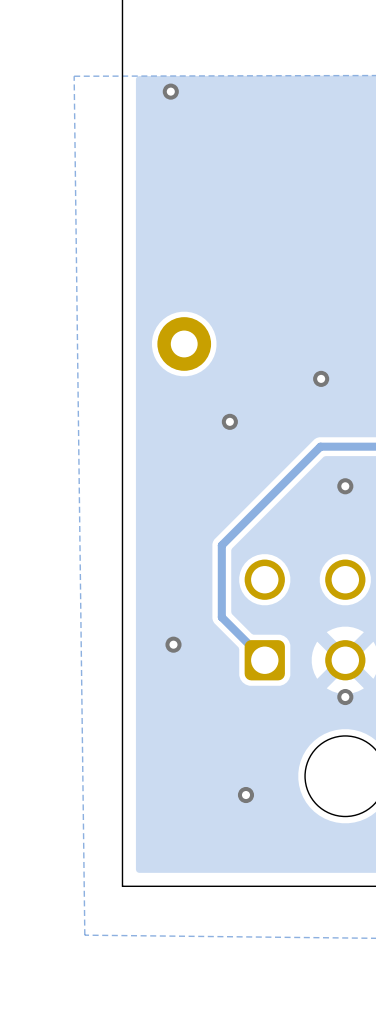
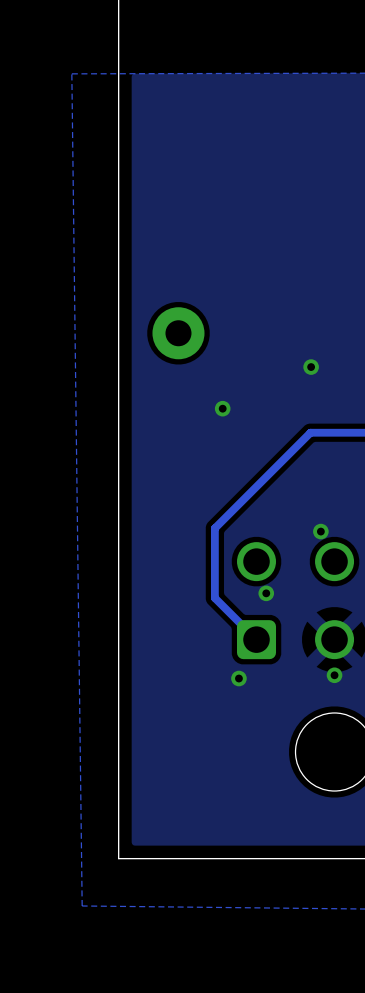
via: (170, 91) -> none
via: (345, 486) -> none
via: none -> (320, 531)
via: none -> (266, 593)
via: (173, 644) -> none
via: none -> (238, 678)
via: (245, 795) -> none

